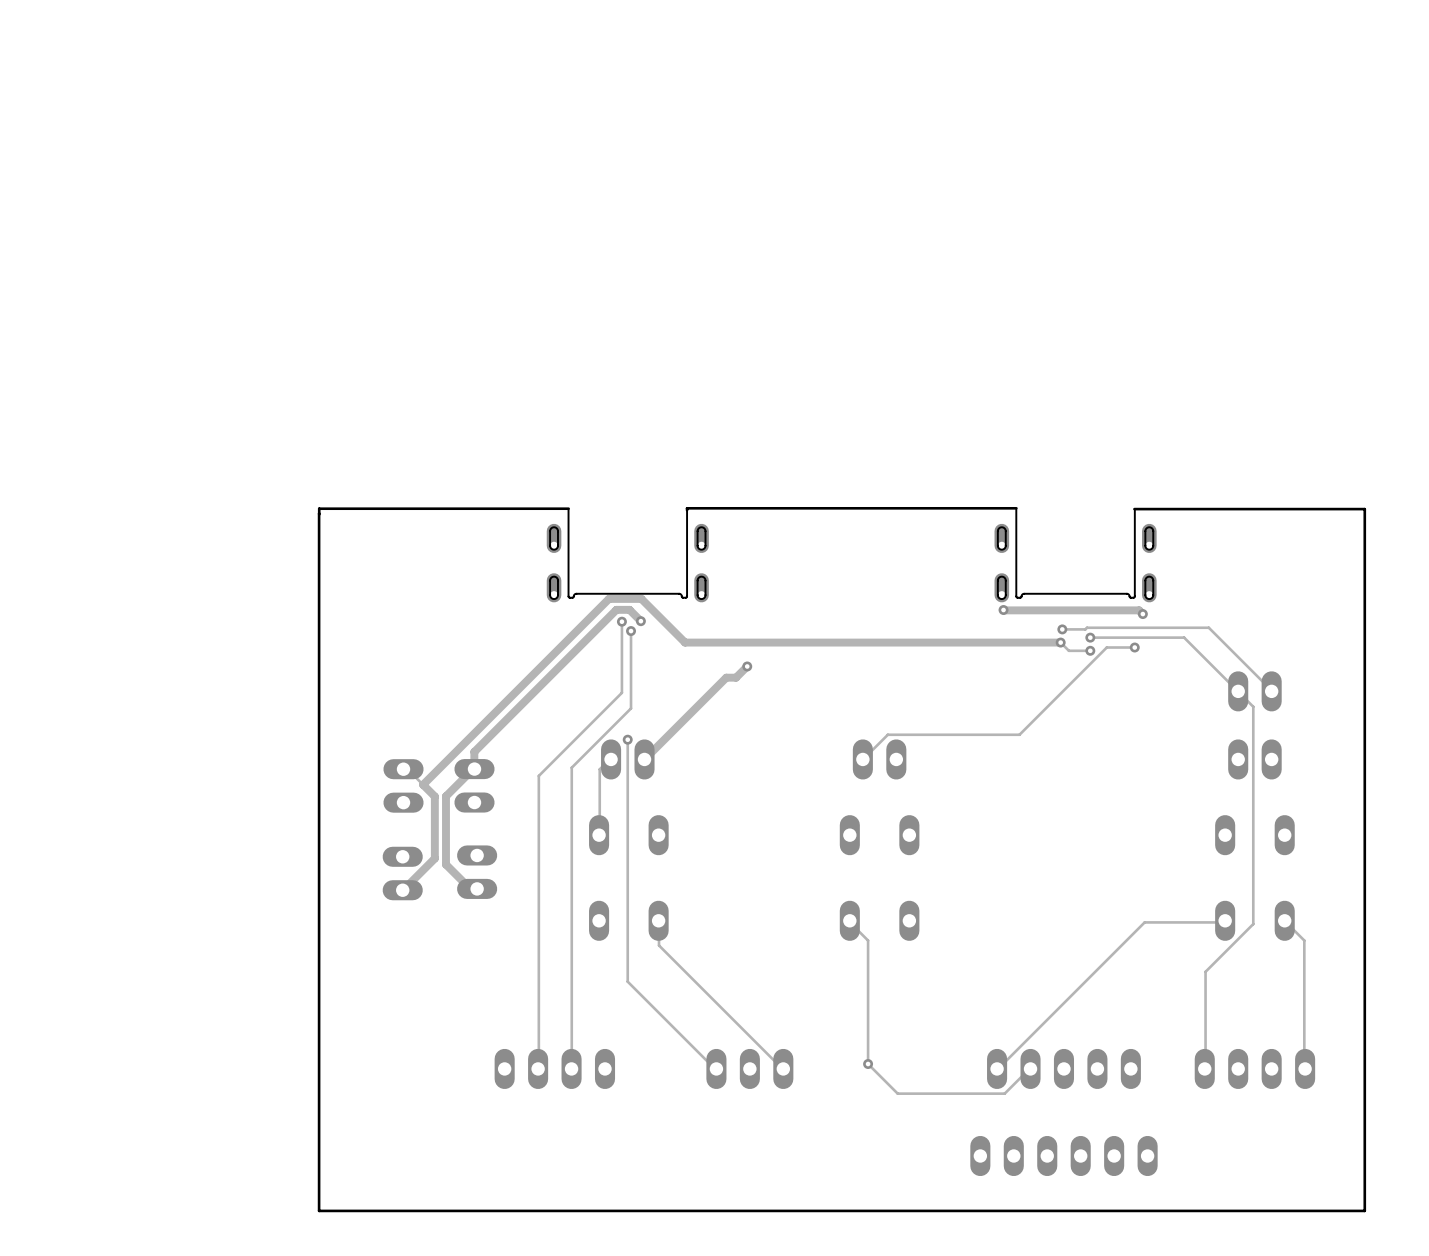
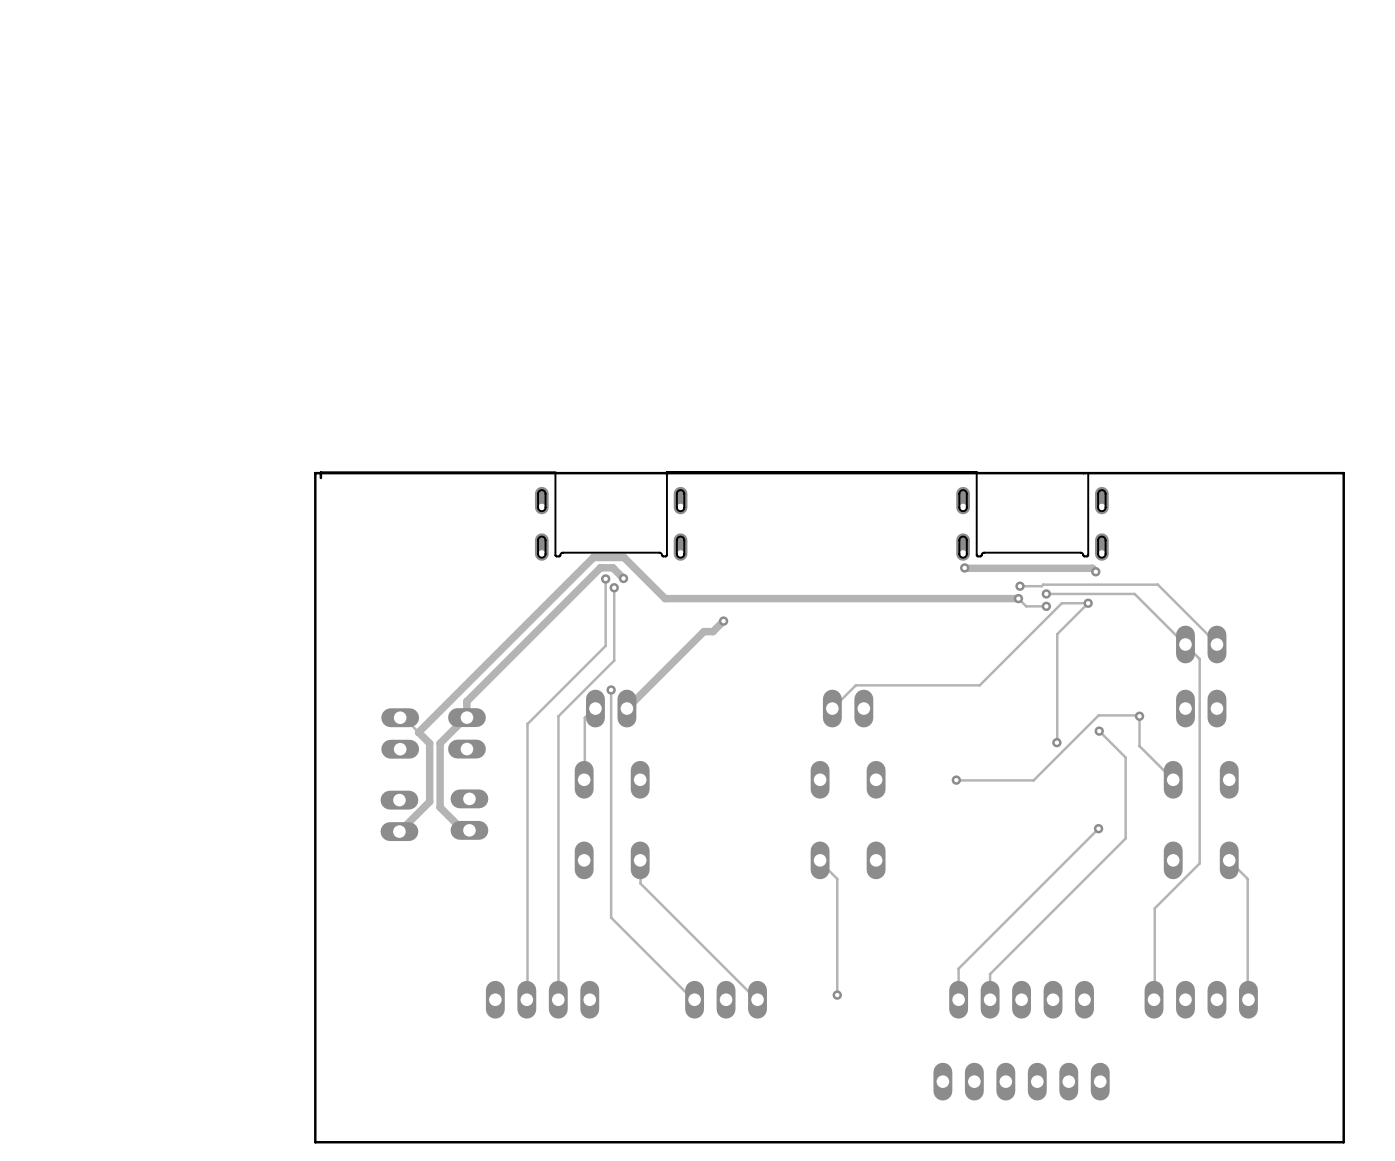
board edge: (1134, 509) (1364, 509) (1364, 1210) (319, 1210) (319, 513) -> none
board edge: none -> (1343, 473) (1343, 1142) (315, 1142) (315, 473) (1343, 473)
track: none -> (1088, 603) (1057, 634) (1056, 742)
via: none -> (1139, 716)
via: none -> (1099, 731)
via: none -> (1056, 742)
via: none -> (956, 780)
track: none -> (1173, 779) (1139, 746) (1138, 715) (1098, 715) (1033, 780) (956, 780)
via: none -> (1098, 828)
track: (1225, 920) (1223, 922) (1144, 922) (997, 1068) -> (1098, 828) (958, 968) (958, 999)
track: (868, 1064) (897, 1093) (1004, 1093) (1030, 1068) -> (1099, 731) (1125, 757) (1125, 838) (990, 974) (990, 999)

